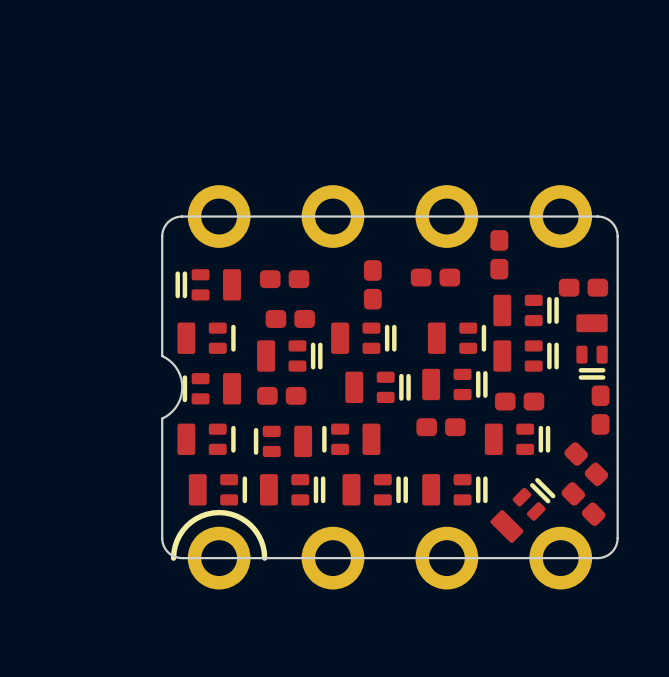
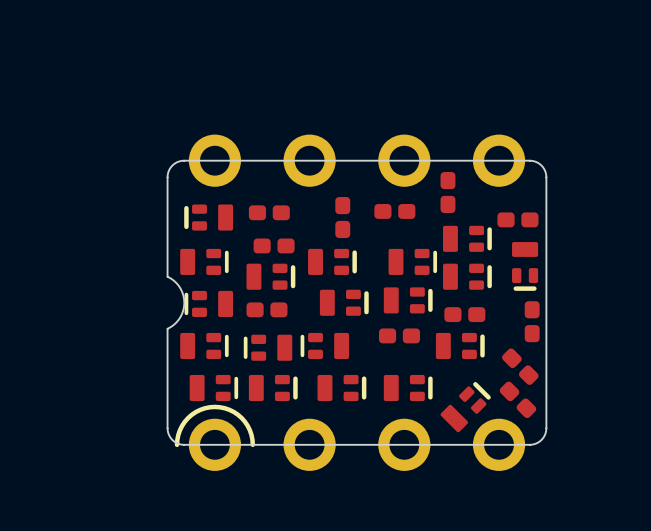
part footprint: [175, 269, 241, 301] -> [184, 204, 234, 231]
part footprint: [493, 294, 559, 327] -> [443, 225, 492, 252]
part footprint: [576, 314, 608, 380] -> [512, 242, 539, 291]
part footprint: [331, 322, 397, 354] -> [308, 248, 357, 275]
part footprint: [257, 340, 323, 372] -> [246, 263, 296, 290]
part footprint: [493, 340, 559, 372] -> [443, 263, 492, 290]
part footprint: [422, 368, 488, 401] -> [383, 287, 433, 314]
part footprint: [345, 371, 411, 404] -> [319, 289, 369, 316]
part footprint: [484, 423, 551, 455] -> [435, 332, 485, 360]
part footprint: [259, 474, 326, 506] -> [248, 374, 298, 402]
part footprint: [342, 474, 408, 506] -> [317, 374, 367, 402]
part footprint: [422, 474, 488, 506] -> [383, 374, 433, 402]
part footprint: [490, 477, 556, 544] -> [440, 382, 491, 433]

